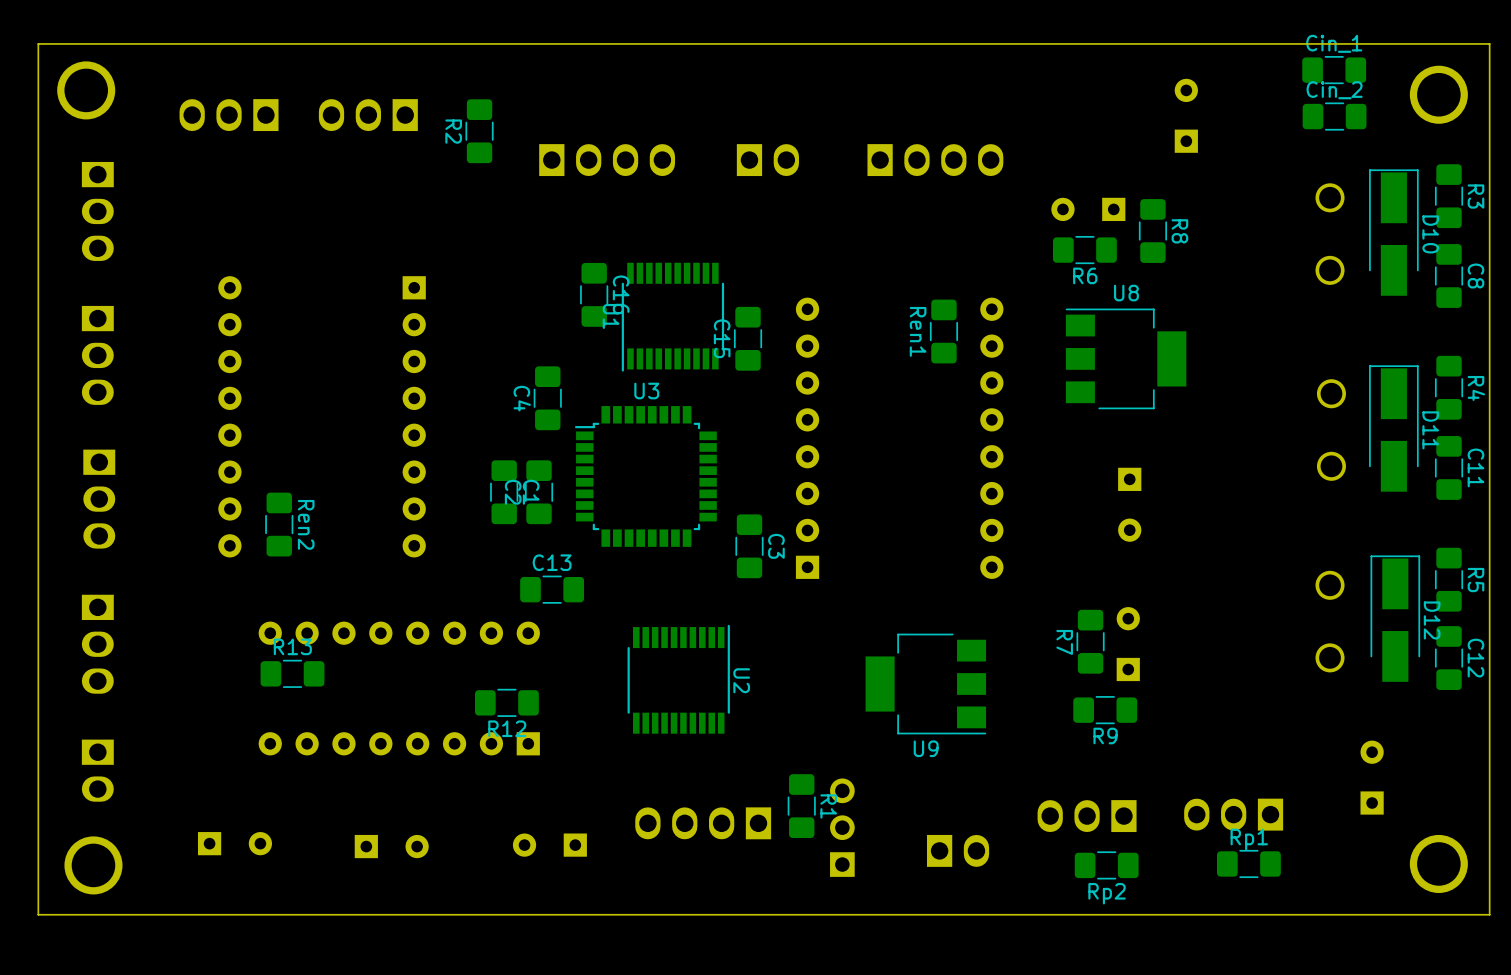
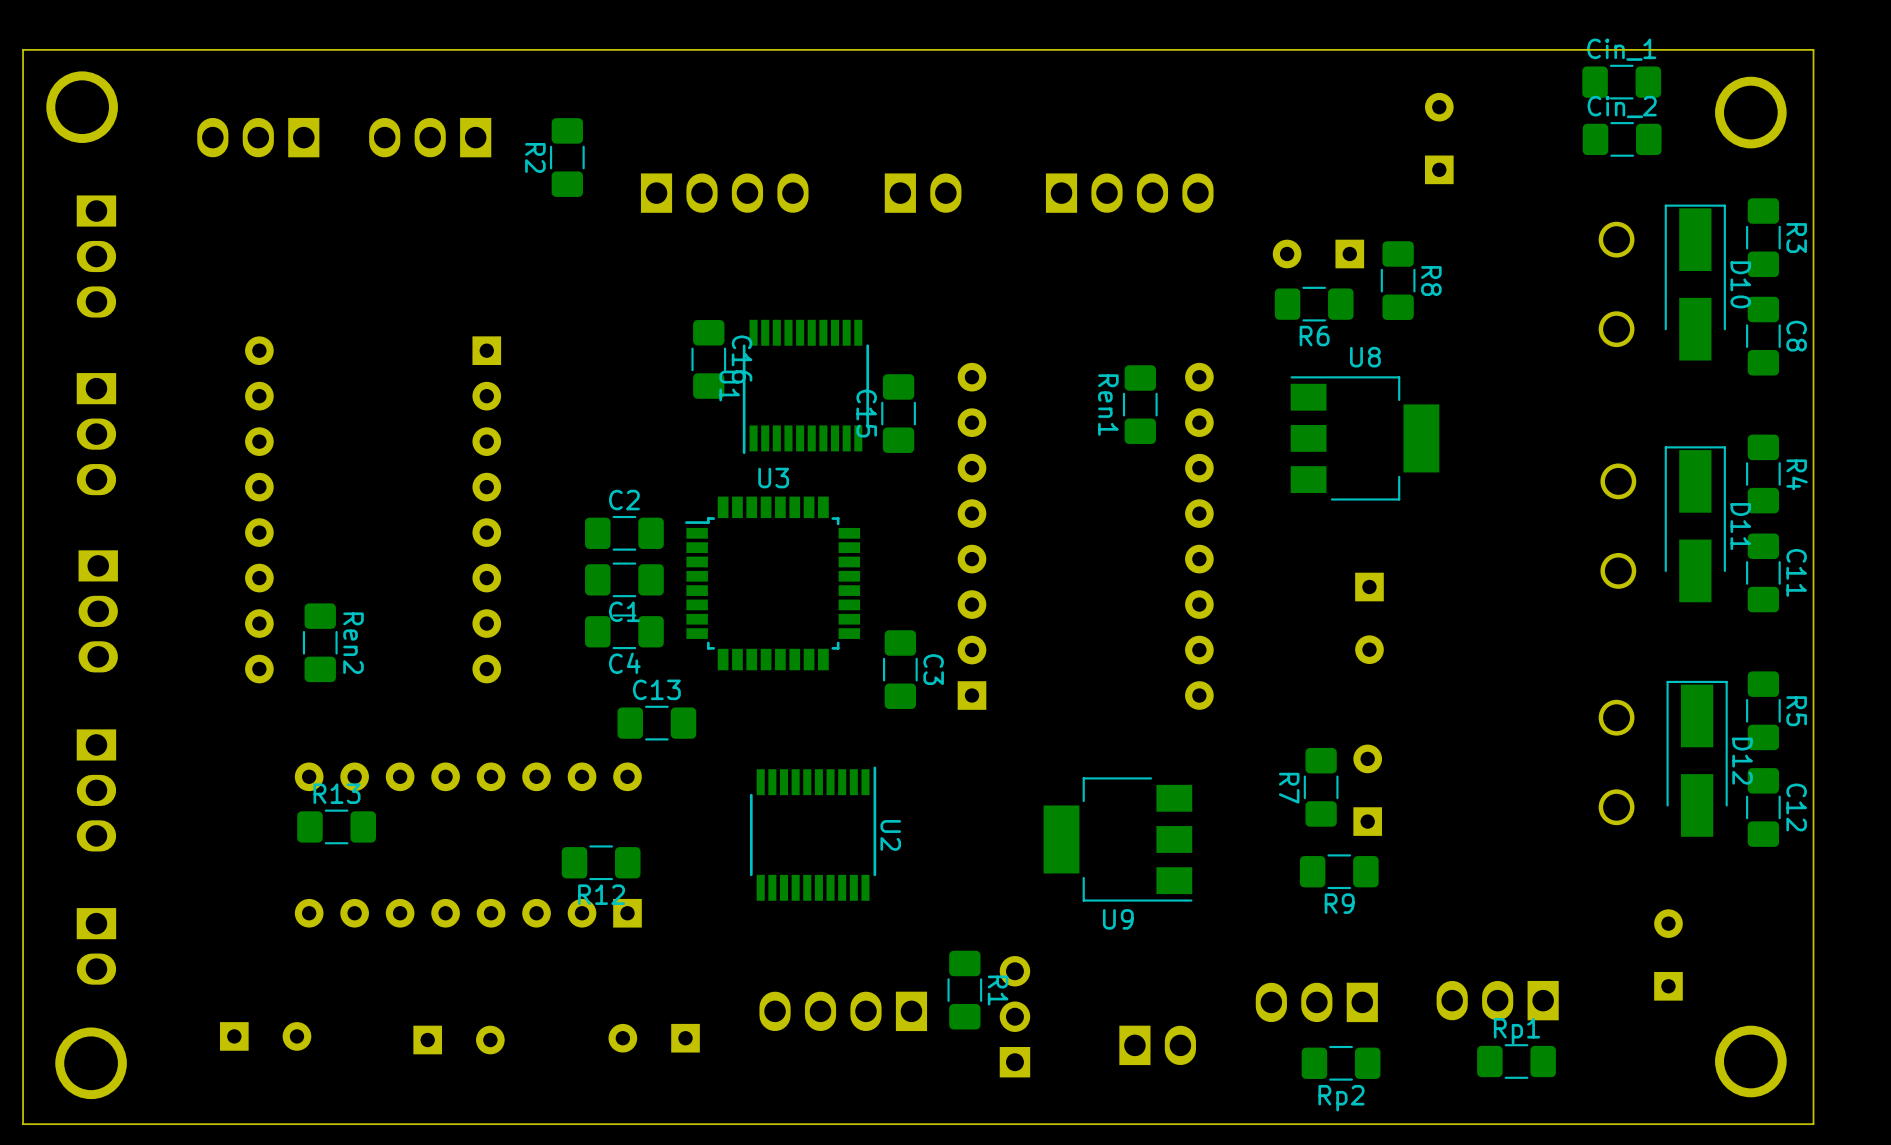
C4 name position: C4 (522, 398) -> C4 (624, 663)
C4 rotation: 0° (547, 398) -> 90° clockwise (624, 631)
C4 position: (547, 398) -> (624, 631)
C1 rotation: 0° (504, 492) -> 90° clockwise (624, 579)
C2 rotation: 0° (539, 492) -> 90° clockwise (624, 533)
C2 position: (539, 492) -> (624, 533)

